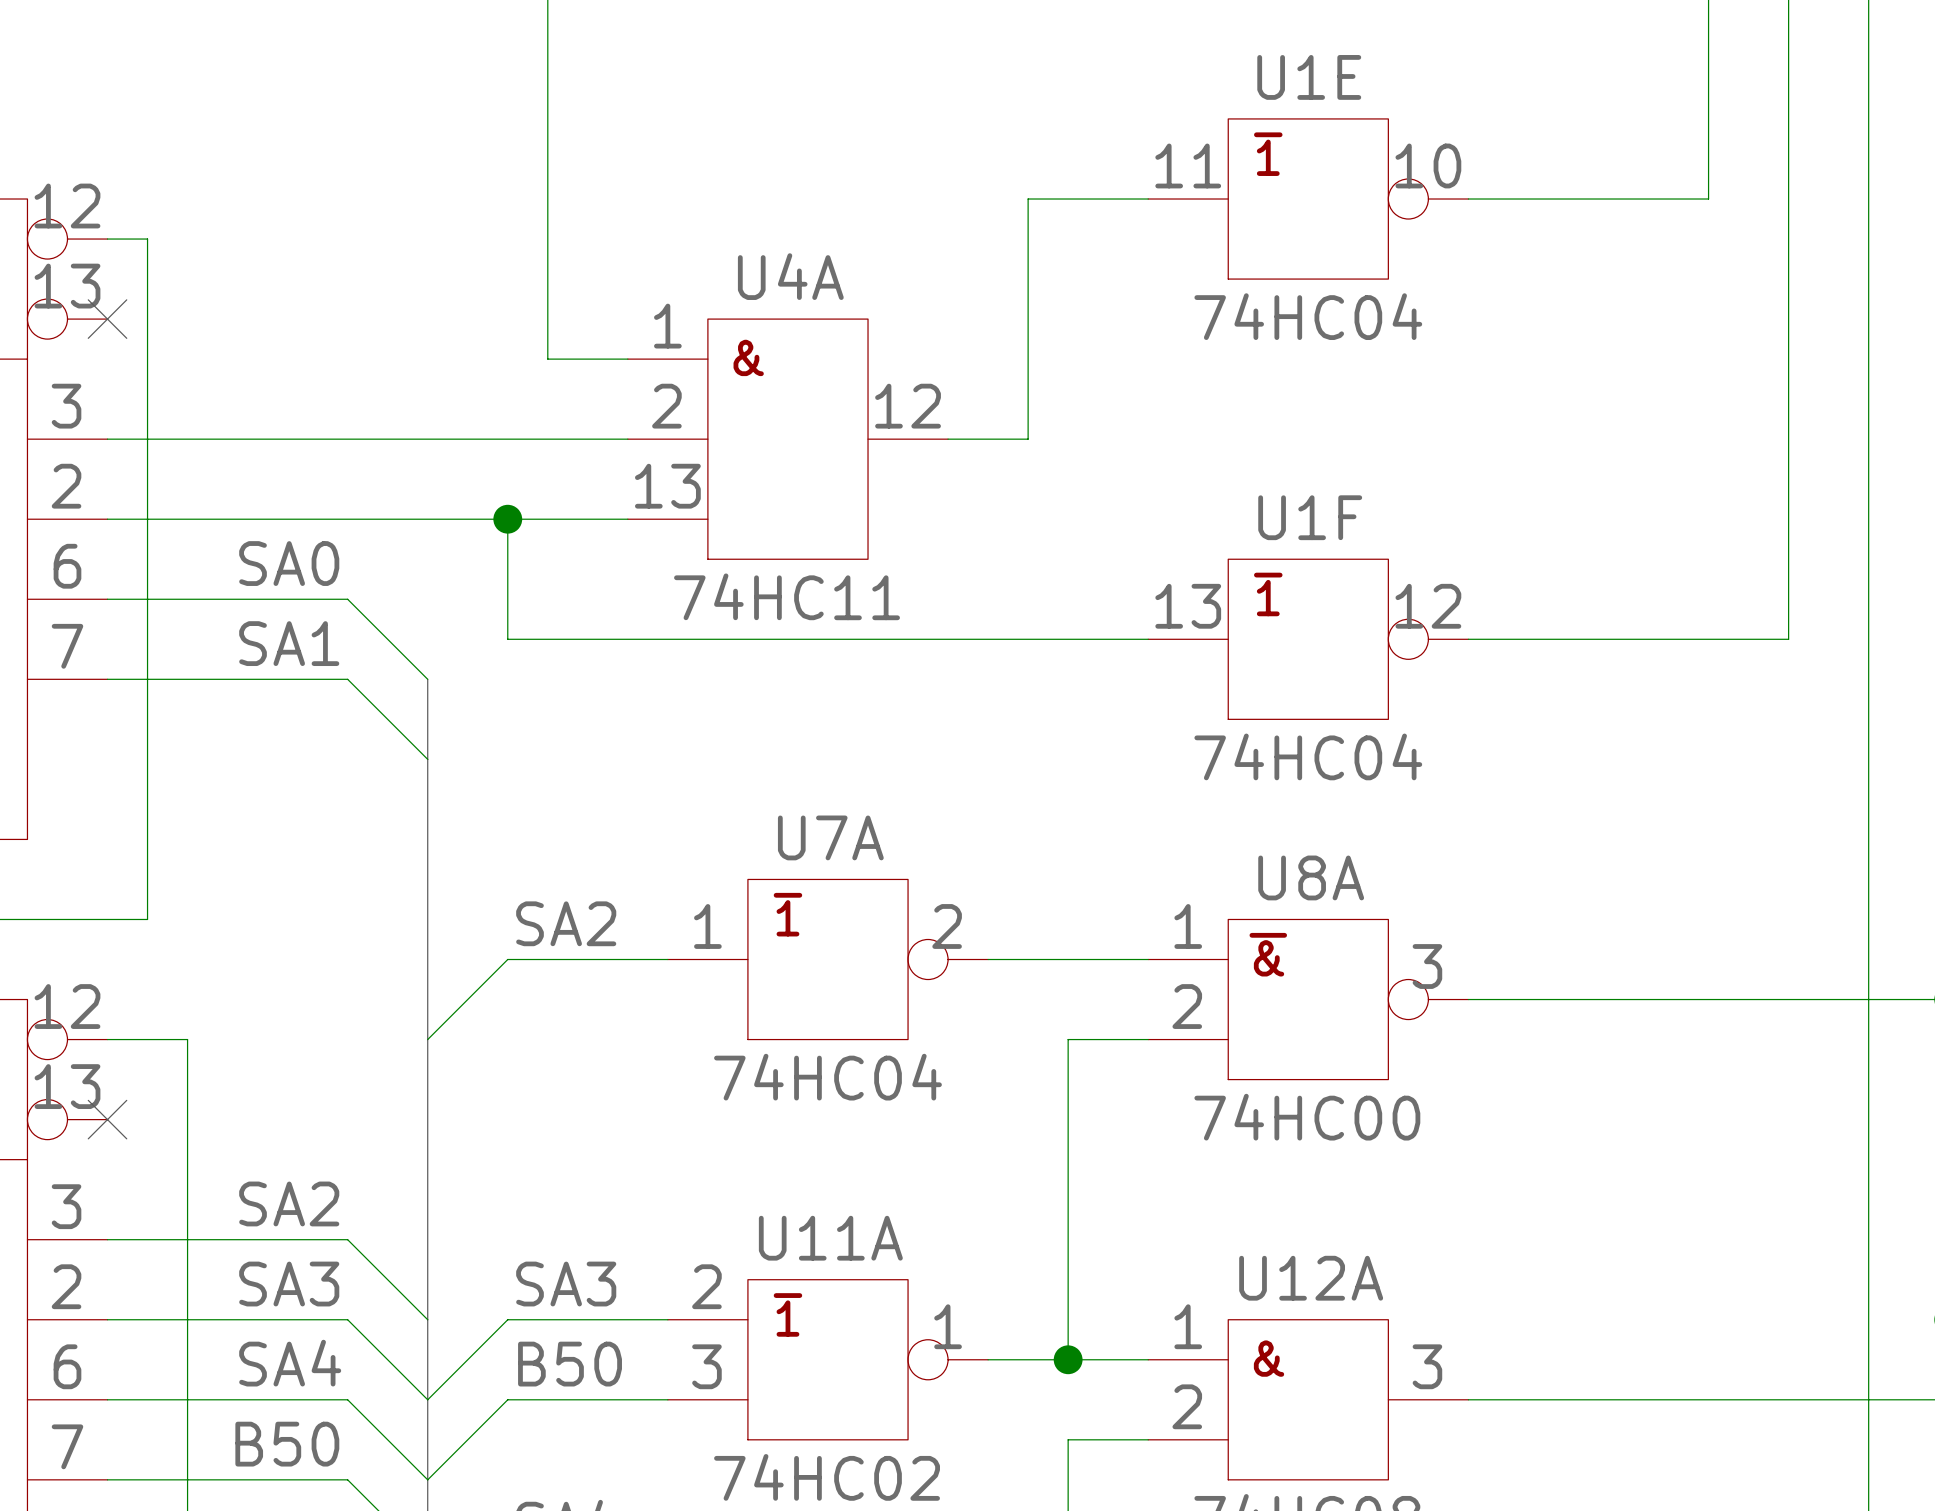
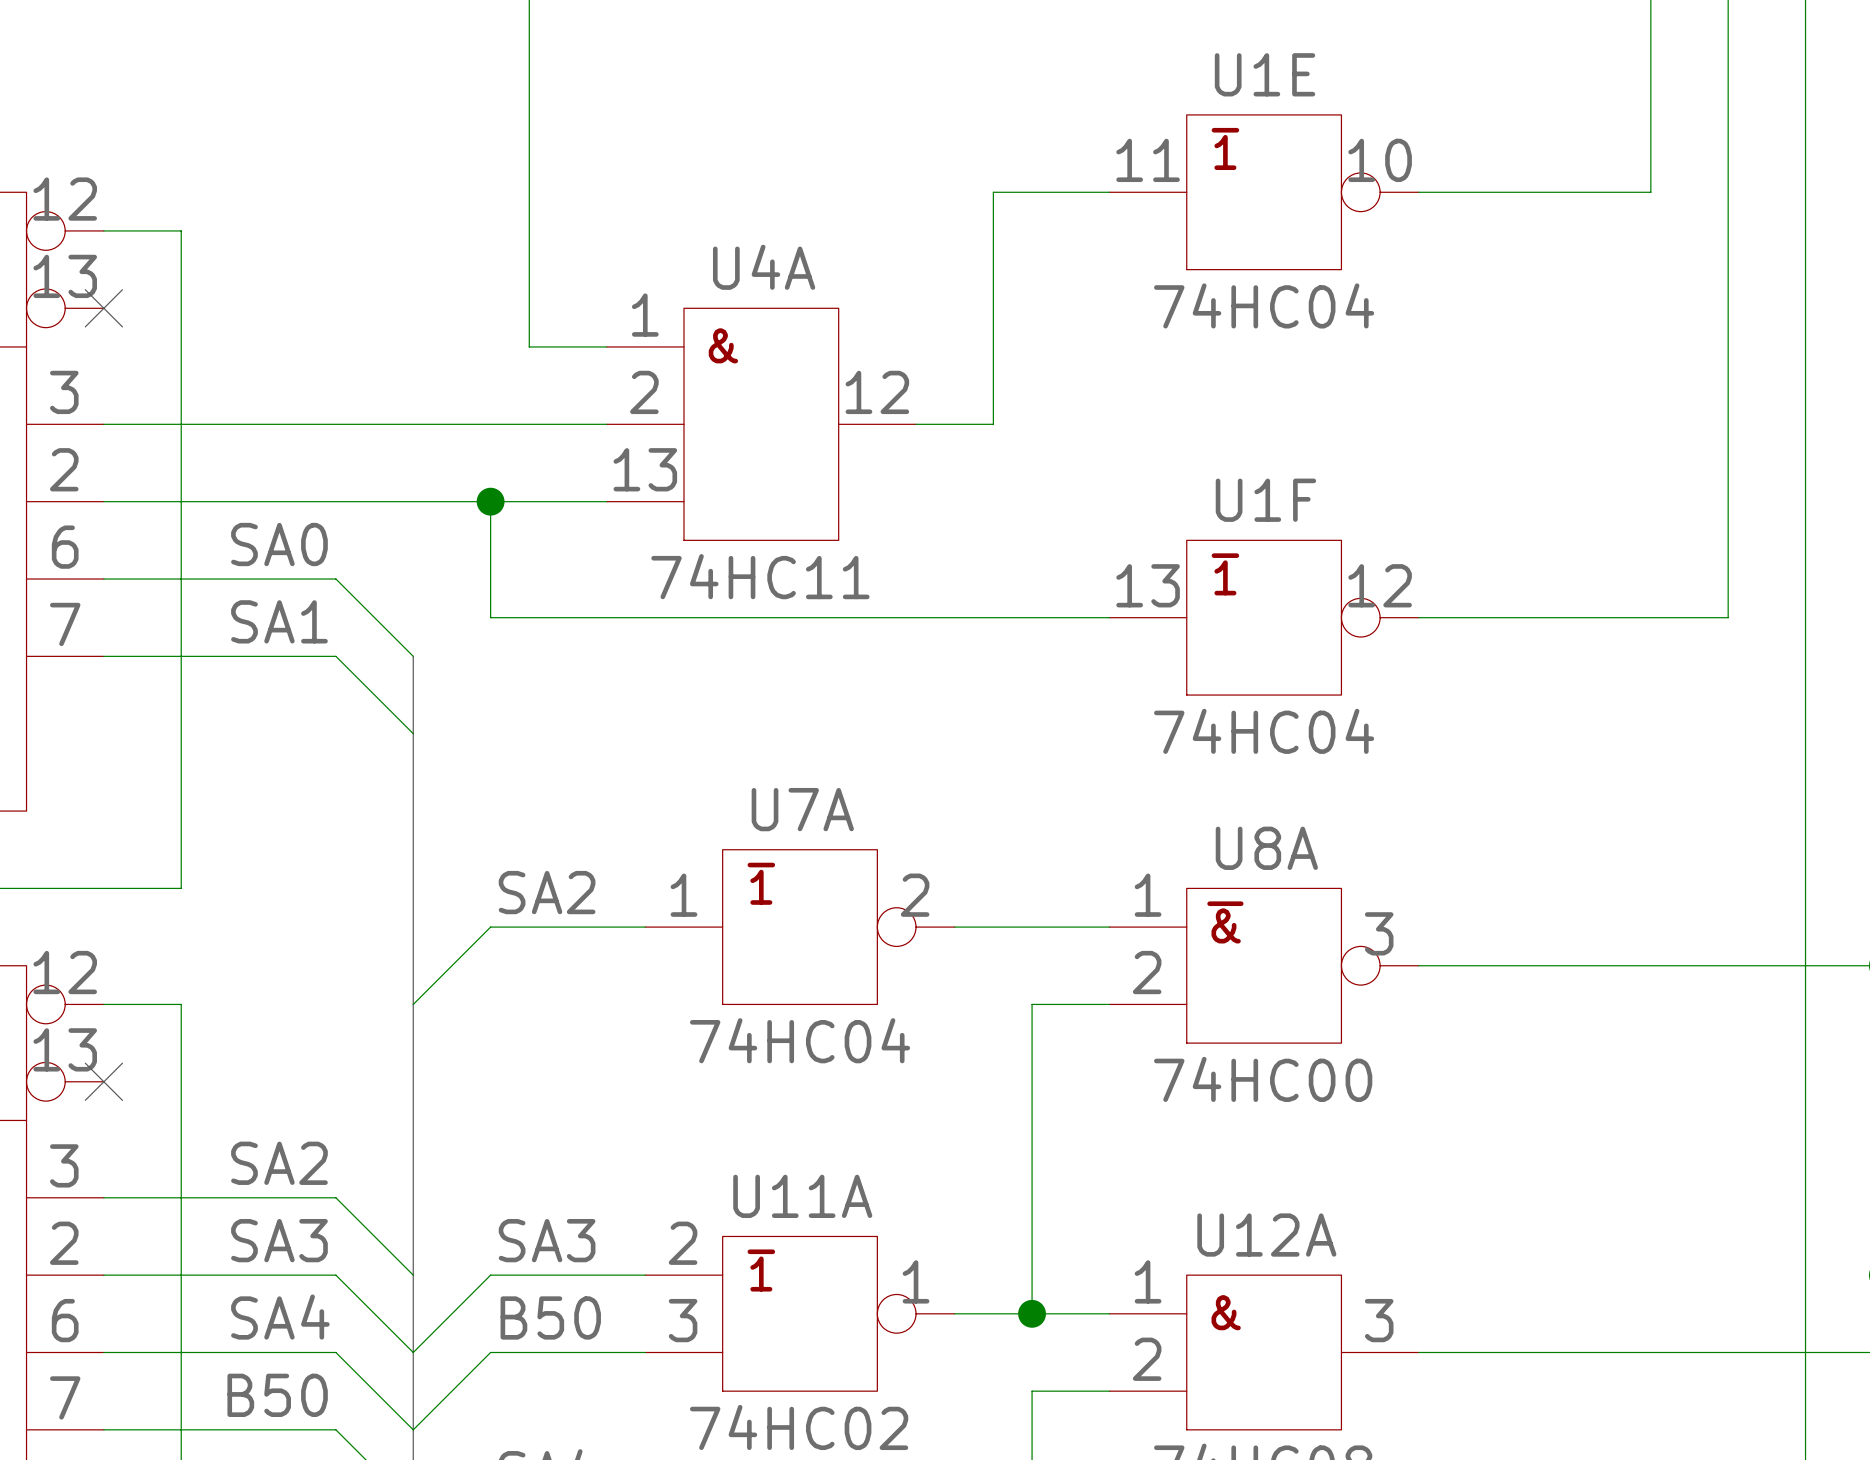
wire: (147, 239) (147, 919) -> (142, 230) (181, 230) (181, 888) (142, 888)

